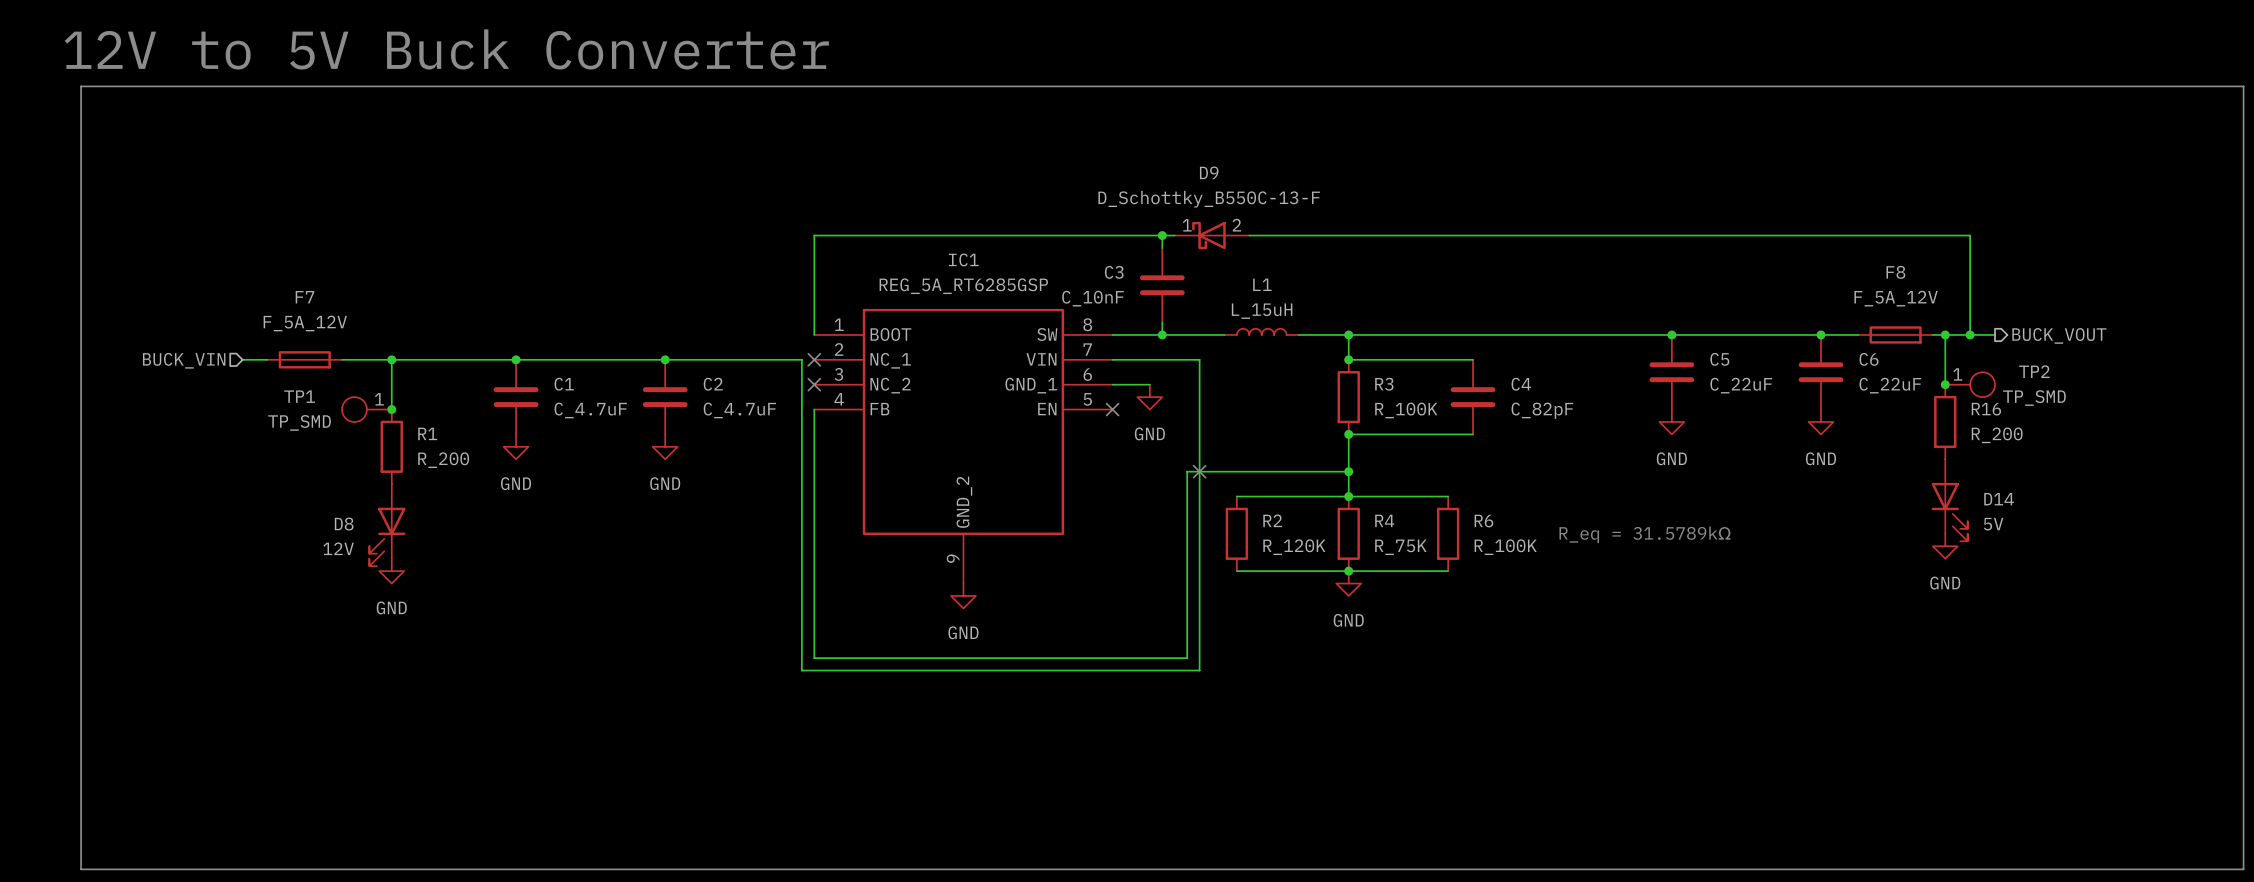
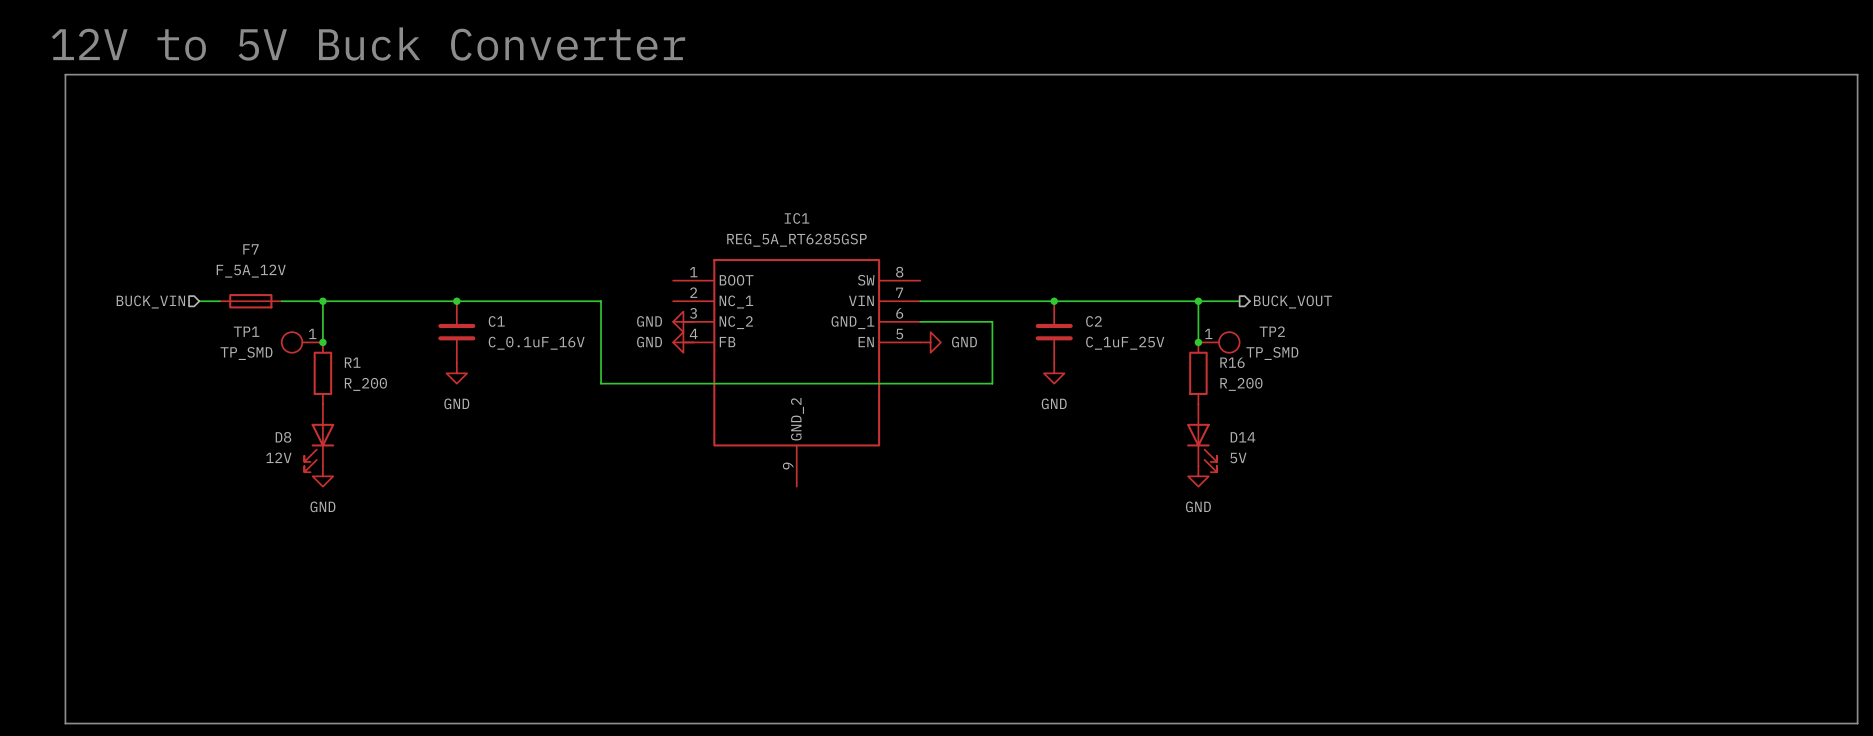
wire: (1162, 235) (1162, 247) -> none
junction: (1162, 235) -> none
wire: (1174, 235) (814, 235) (814, 334) -> none
D9: D_Schottky_B550C-13-F (1212, 235) -> none
wire: (1249, 235) (1970, 235) (1970, 334) -> none
C3: C_10nF (1162, 285) -> none
wire: (1162, 322) (1162, 334) -> none
L1: L_15uH (1261, 331) -> none
wire: (1112, 334) (1224, 334) -> none
junction: (1162, 334) -> none
wire: (1299, 334) (1858, 334) -> none
wire: (1348, 334) (1348, 359) -> (992, 301) (1116, 301)
junction: (1348, 334) -> none
junction: (1671, 334) -> none
junction: (1821, 334) -> none
F8: F_5A_12V (1895, 334) -> none
wire: (1932, 334) (1995, 334) -> none
wire: (1945, 334) (1945, 384) -> none
junction: (1945, 334) -> none
junction: (1970, 334) -> none
hierarchical label: BUCK_VOUT (2059, 335) -> none
junction position: (516, 359) -> (456, 301)
junction: (665, 359) -> none
wire: (727, 359) (801, 359) (801, 670) (1199, 670) (1199, 459) -> (601, 301) (601, 383) (992, 383)
no-connect mark: (814, 359) -> none
wire: (1199, 359) (1199, 384) -> (951, 321) (992, 321)
junction: none -> (1054, 301)
junction: (1348, 359) -> none
wire: none -> (1198, 301) (1198, 342)
junction: none -> (1198, 301)
wire: none -> (1219, 301) (1239, 301)
hierarchical label: none -> BUCK_VOUT (1292, 302)
C5: C_22uF (1671, 372) -> none
C6: C_22uF (1821, 372) -> none
no-connect mark: (814, 384) -> none
power symbol: none -> GND (683, 321)
junction: (1945, 384) -> none
TP2 position: (1970, 384) -> (1219, 342)
C1 position: (516, 397) -> (456, 332)
C2 position: (665, 397) -> (1054, 332)
power symbol rotation: 0° (1149, 397) -> 90° counterclockwise (930, 342)
power symbol position: GND (1149, 397) -> GND (930, 342)
R3: R_100K (1348, 397) -> none
C4: C_82pF (1473, 397) -> none
wire: (814, 409) (814, 658) (1187, 658) (1187, 471) (1348, 471) -> none
power symbol: none -> GND (683, 342)
no-connect mark: (1112, 409) -> none
junction: none -> (1198, 342)
C1 value: C_4.7uF (590, 410) -> C_0.1uF_16V (536, 343)
C2 value: C_4.7uF (739, 410) -> C_1uF_25V (1125, 343)
power symbol: GND (1671, 421) -> none
power symbol: GND (1821, 421) -> none
R16 position: (1945, 421) -> (1198, 373)
junction: (1348, 434) -> none
wire: (1473, 434) (1348, 434) (1348, 496) -> none
power symbol position: GND (516, 446) -> GND (456, 373)
power symbol: GND (665, 446) -> none
power symbol: none -> GND (1054, 373)
no-connect mark: (1199, 471) -> none
junction: (1348, 471) -> none
wire: (1236, 496) (1448, 496) -> none
junction: (1348, 496) -> none
D14 position: (1949, 500) -> (1202, 438)
R2: R_120K (1236, 533) -> none
R4: R_75K (1348, 533) -> none
R6: R_100K (1448, 533) -> none
text: R_eq = 31.5789kΩ (1645, 534) -> none
power symbol: GND (1945, 546) -> none
wire: (1236, 571) (1448, 571) -> none
junction: (1348, 571) -> none
power symbol: none -> GND (1198, 476)
power symbol: GND (1348, 583) -> none
power symbol: GND (963, 595) -> none

